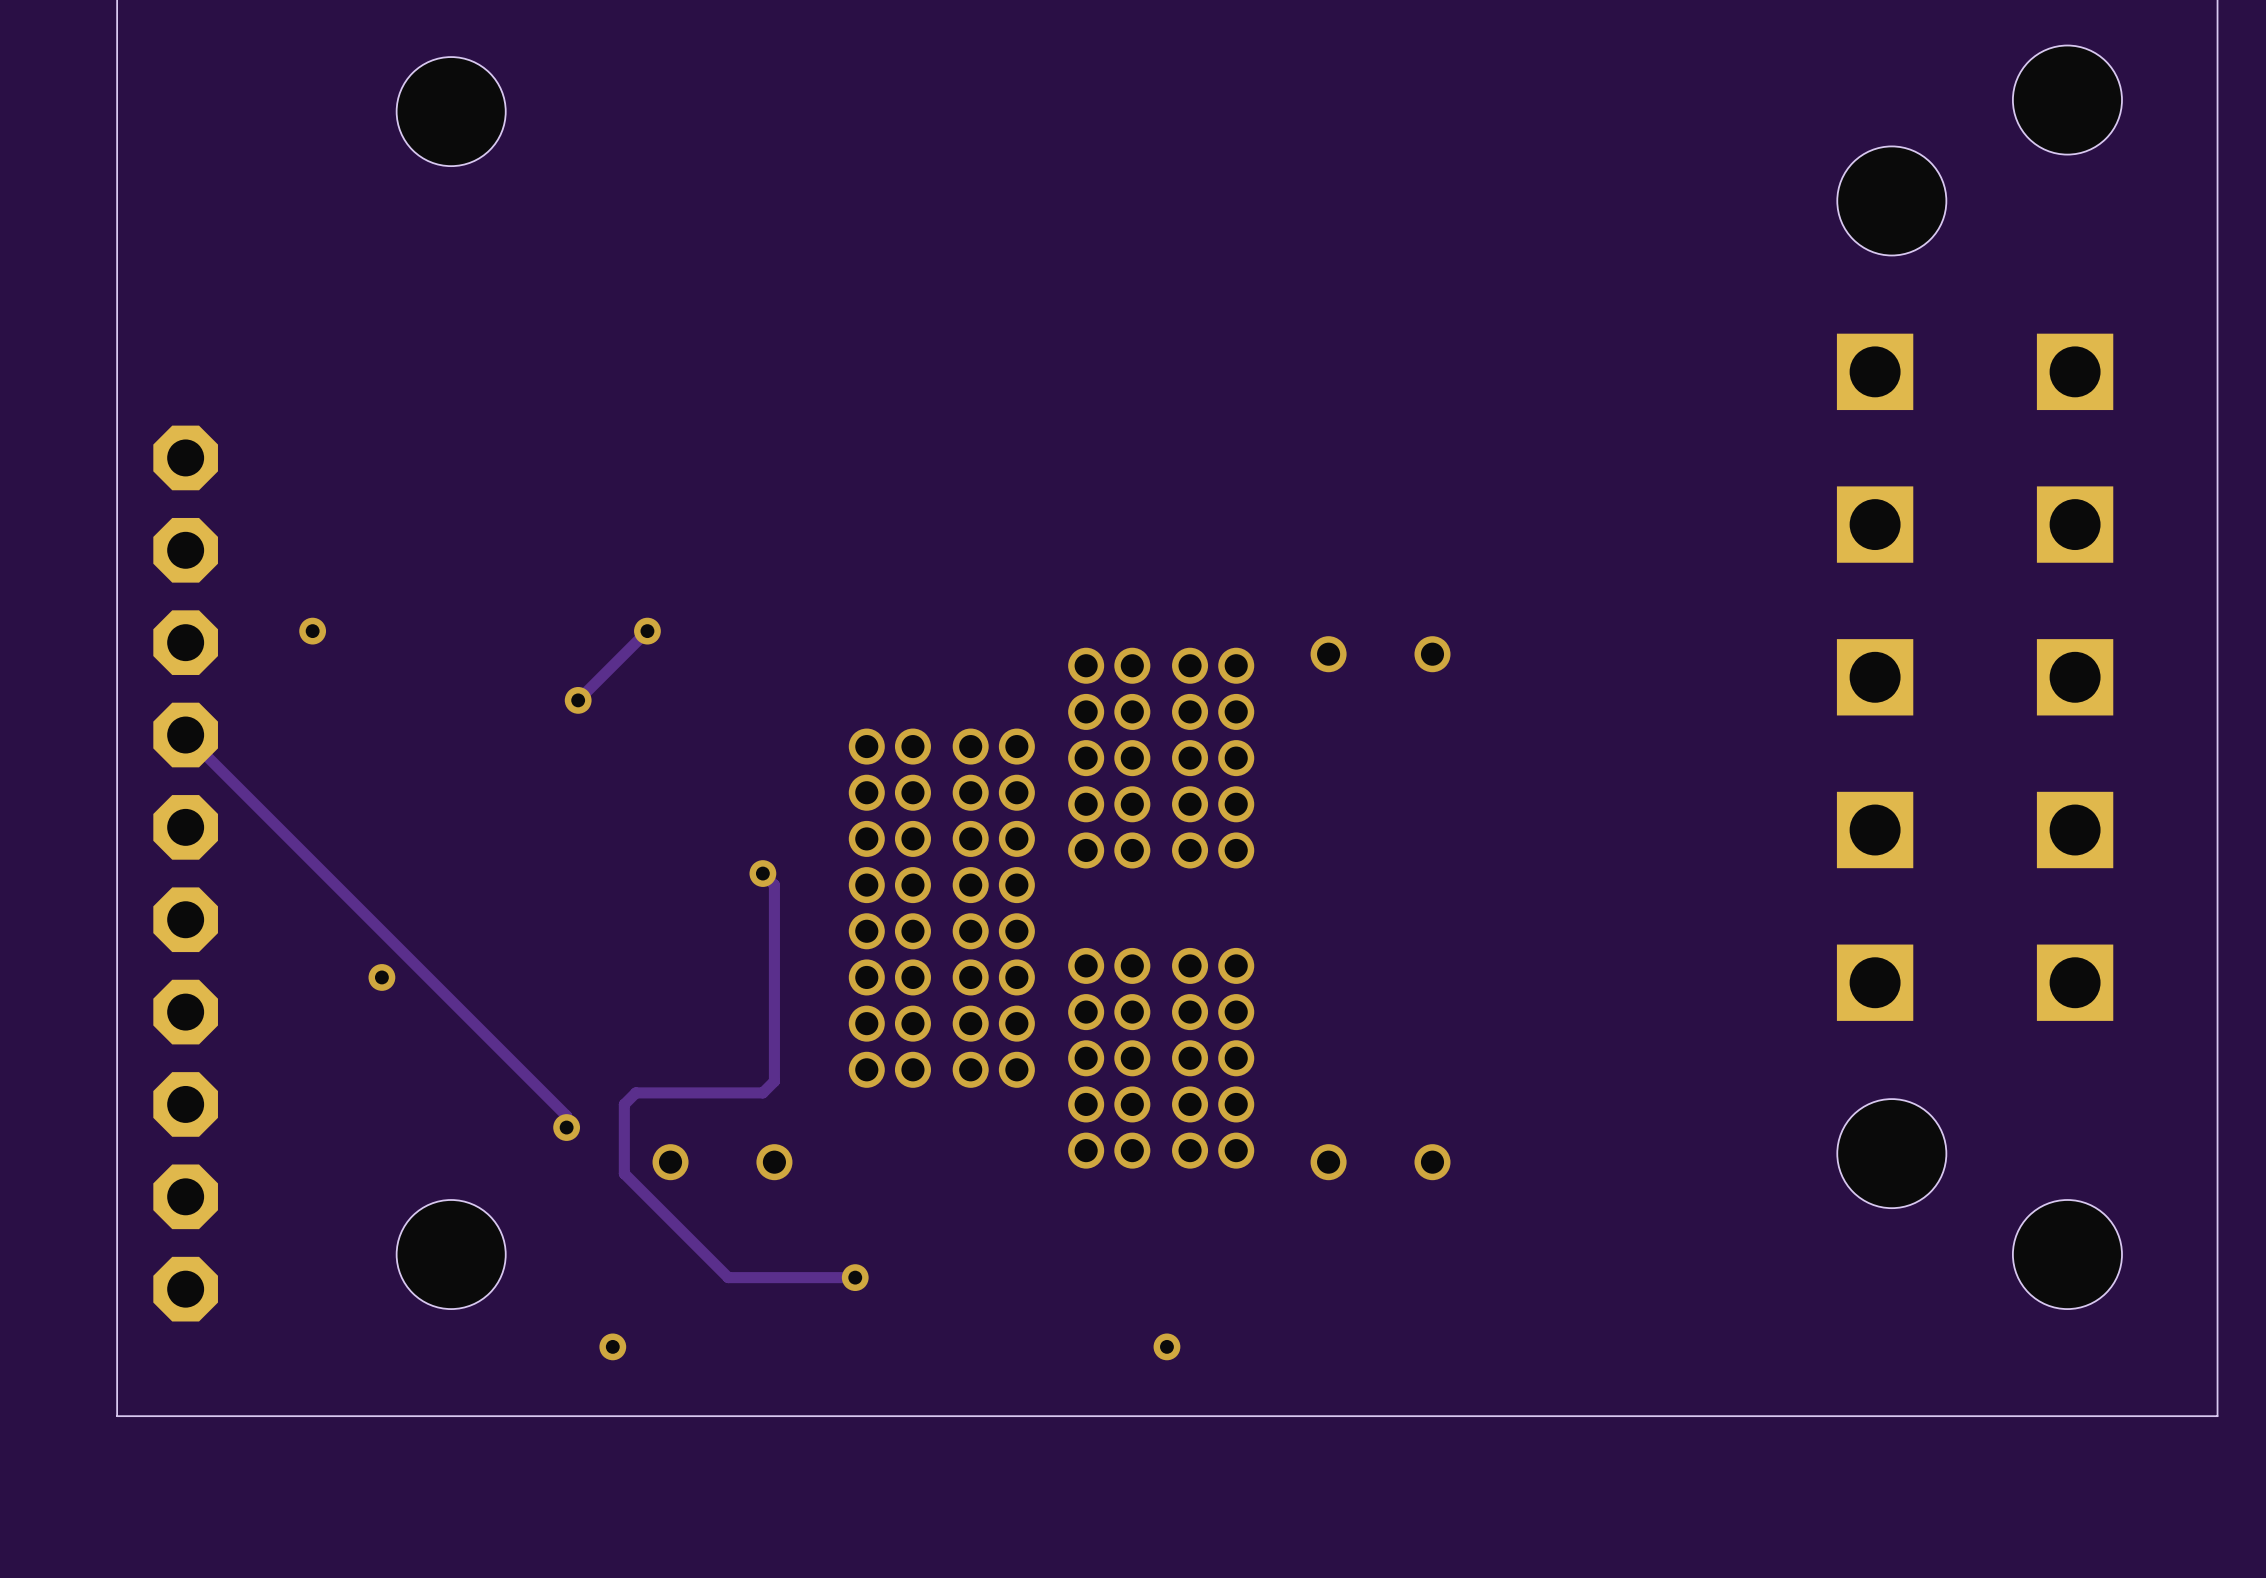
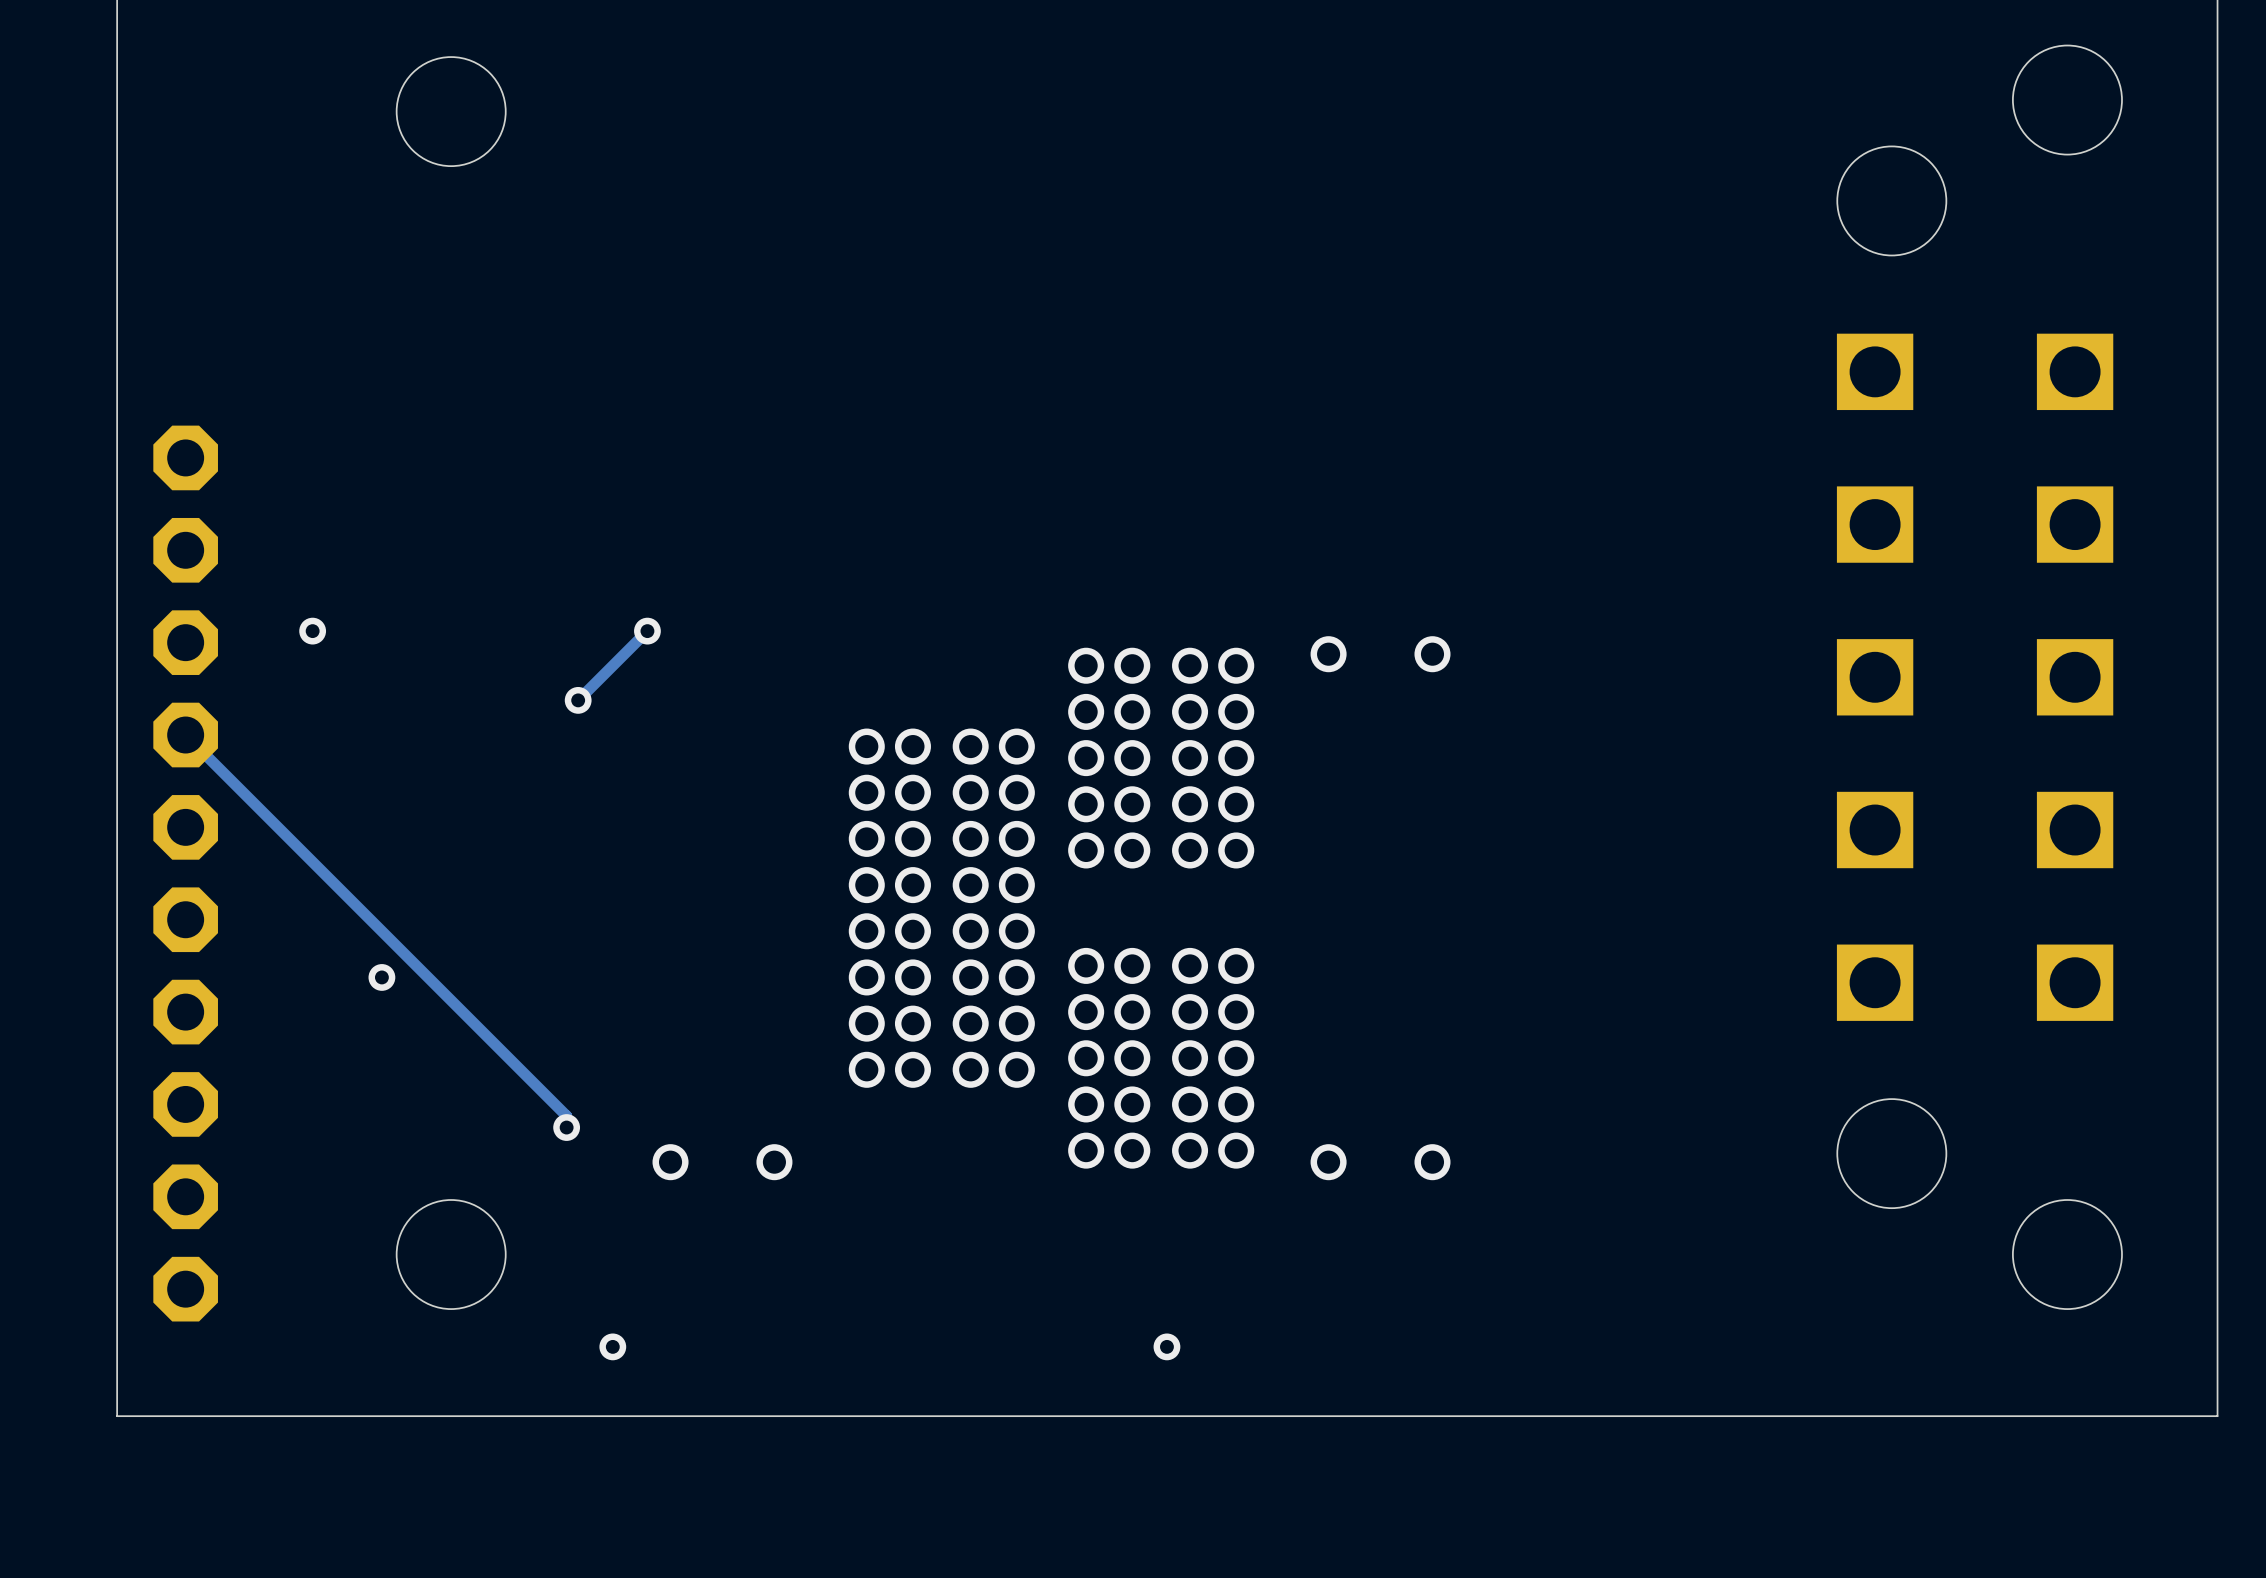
track: (762, 873) (774, 885) (774, 1081) (762, 1092) (635, 1092) (624, 1104) (624, 1173) (728, 1277) (855, 1277) -> none
via: (762, 873) -> none
via: (855, 1277) -> none

